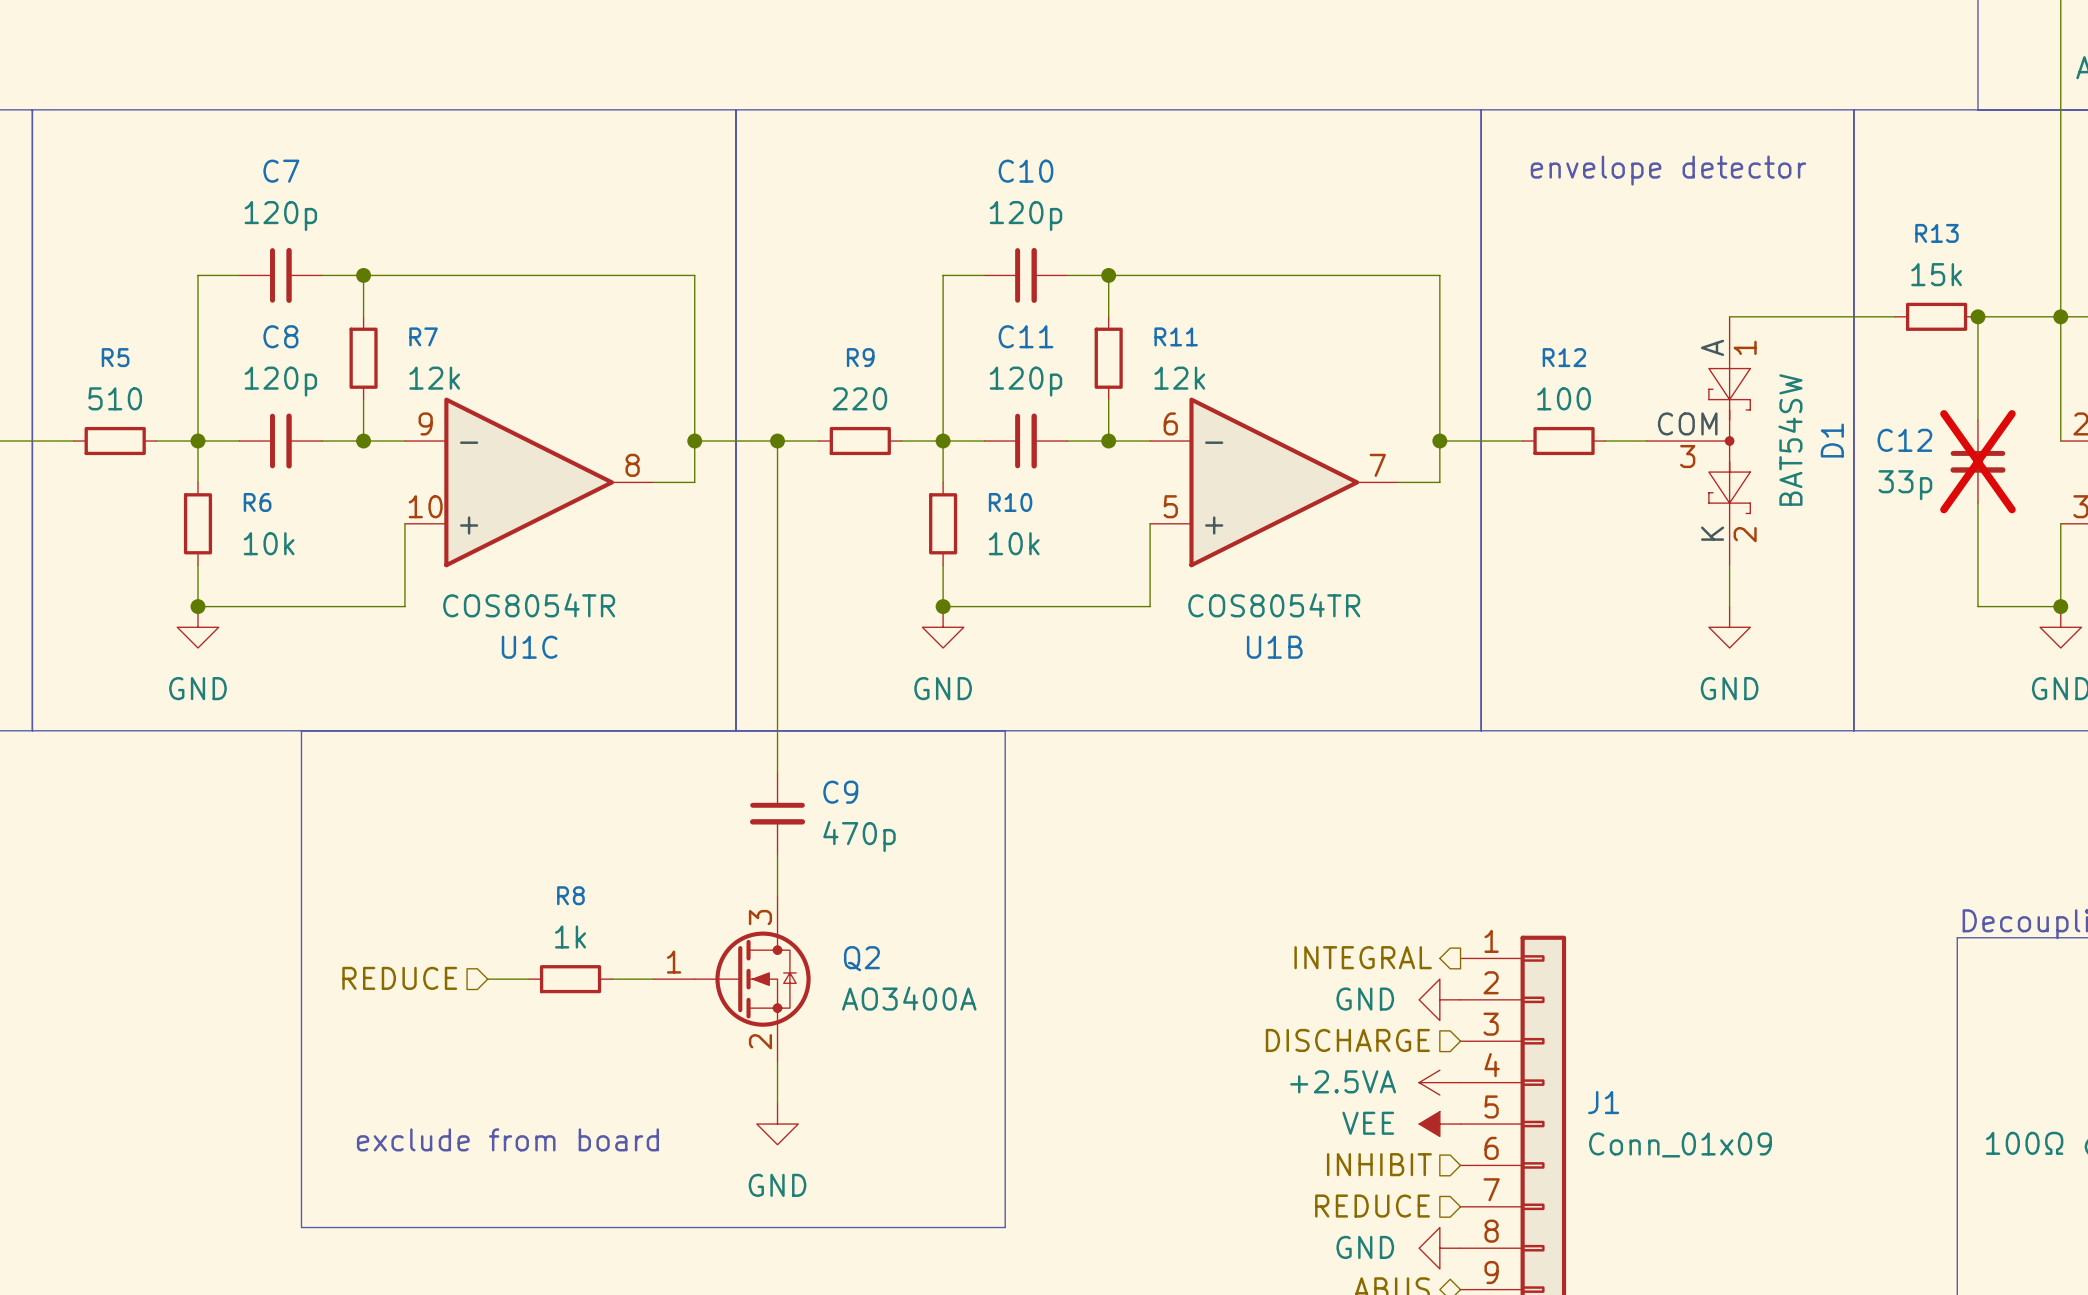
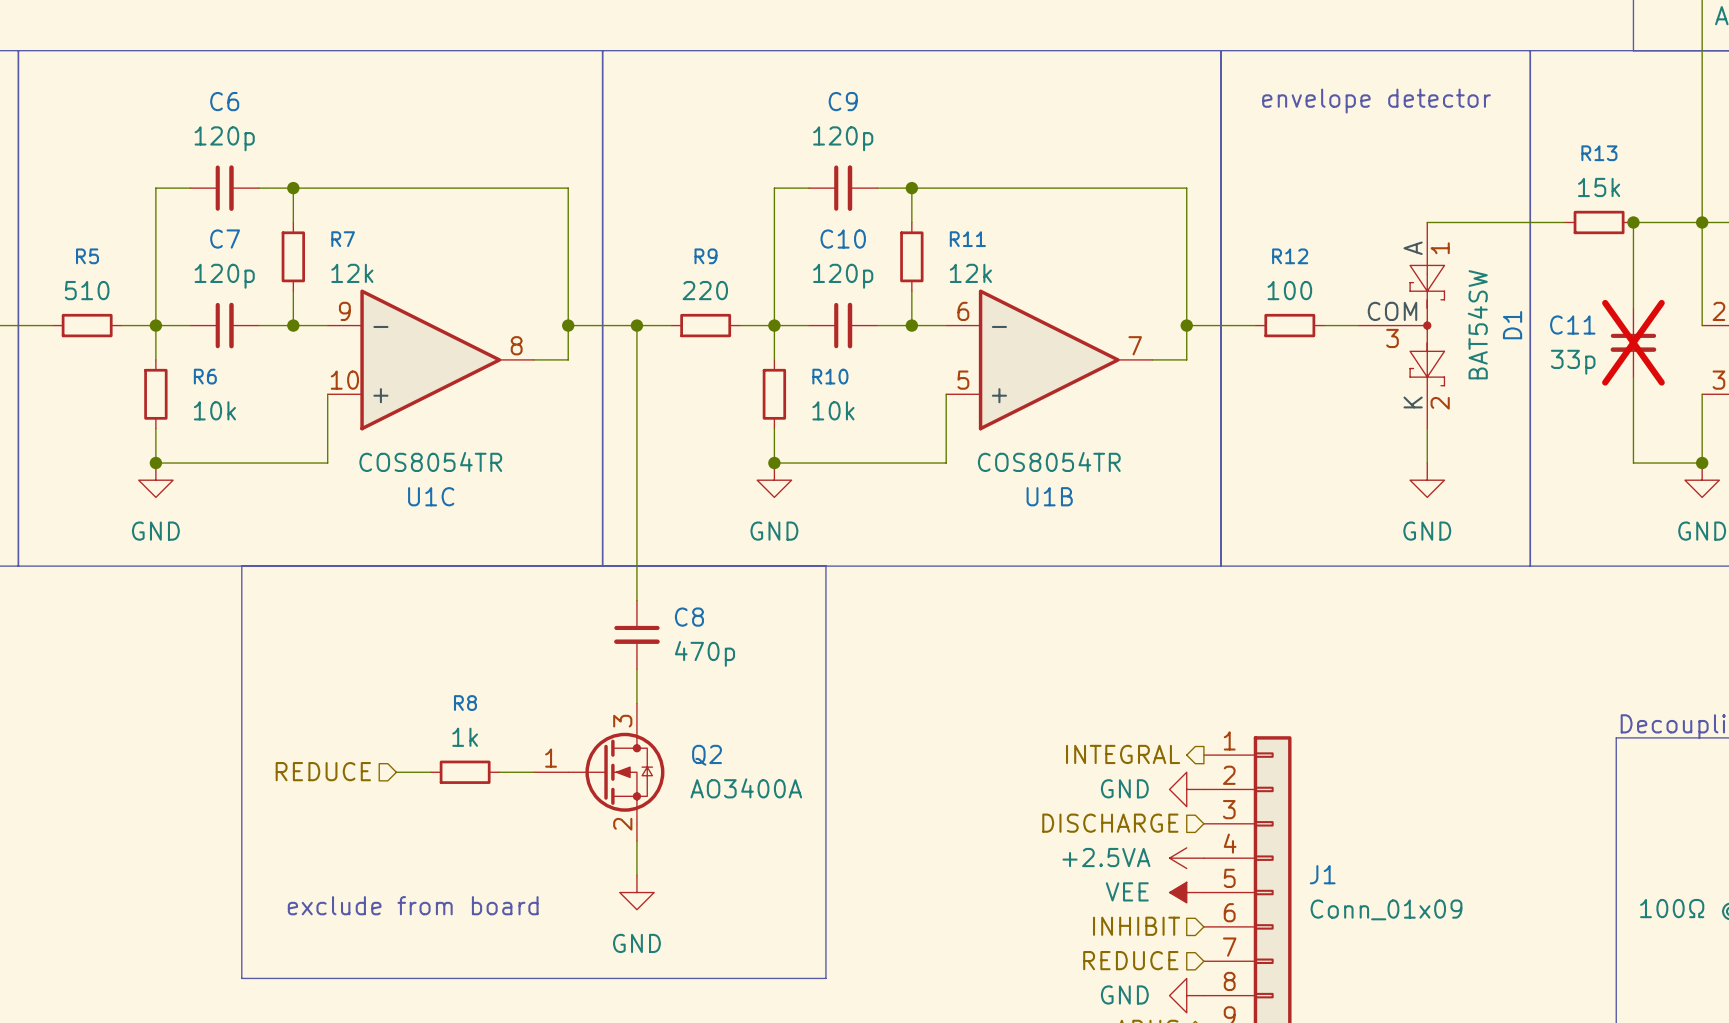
C7 name: C7 (281, 171) -> C6 (224, 101)
C10 name: C10 (1025, 171) -> C9 (843, 101)
C8 name: C8 (280, 336) -> C7 (225, 239)
C11 name: C11 (1025, 336) -> C10 (843, 239)
C12 name: C12 (1904, 440) -> C11 (1572, 325)
C9 name: C9 (840, 792) -> C8 (689, 617)

